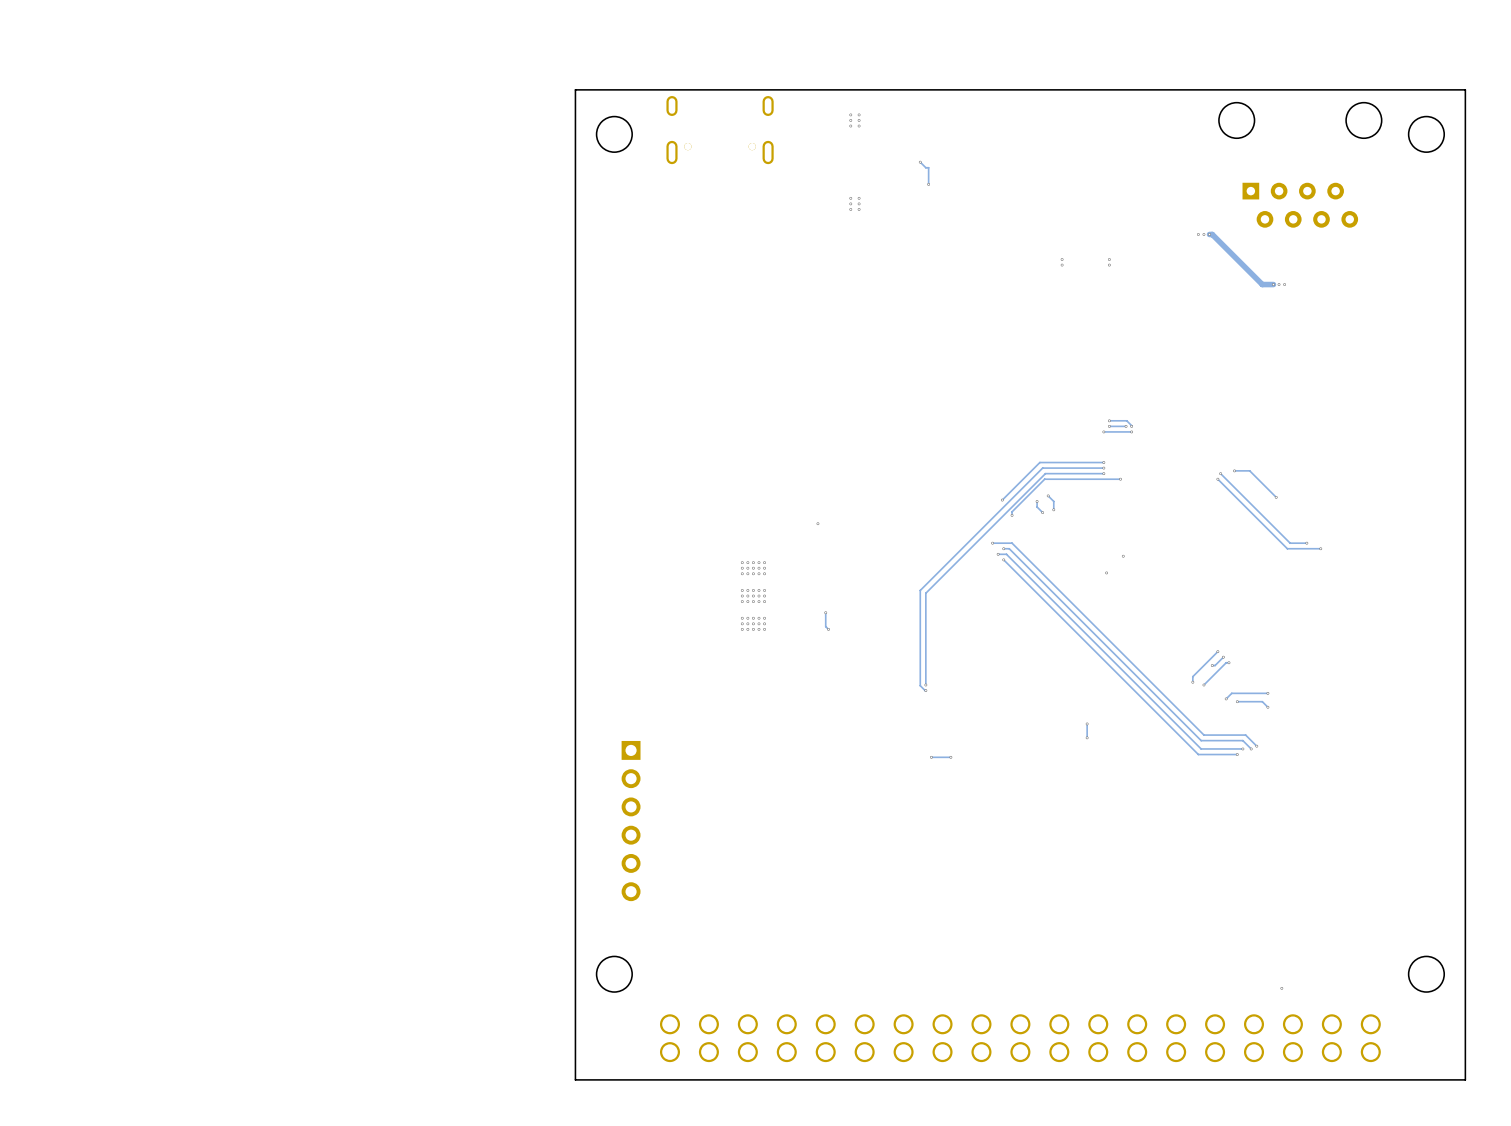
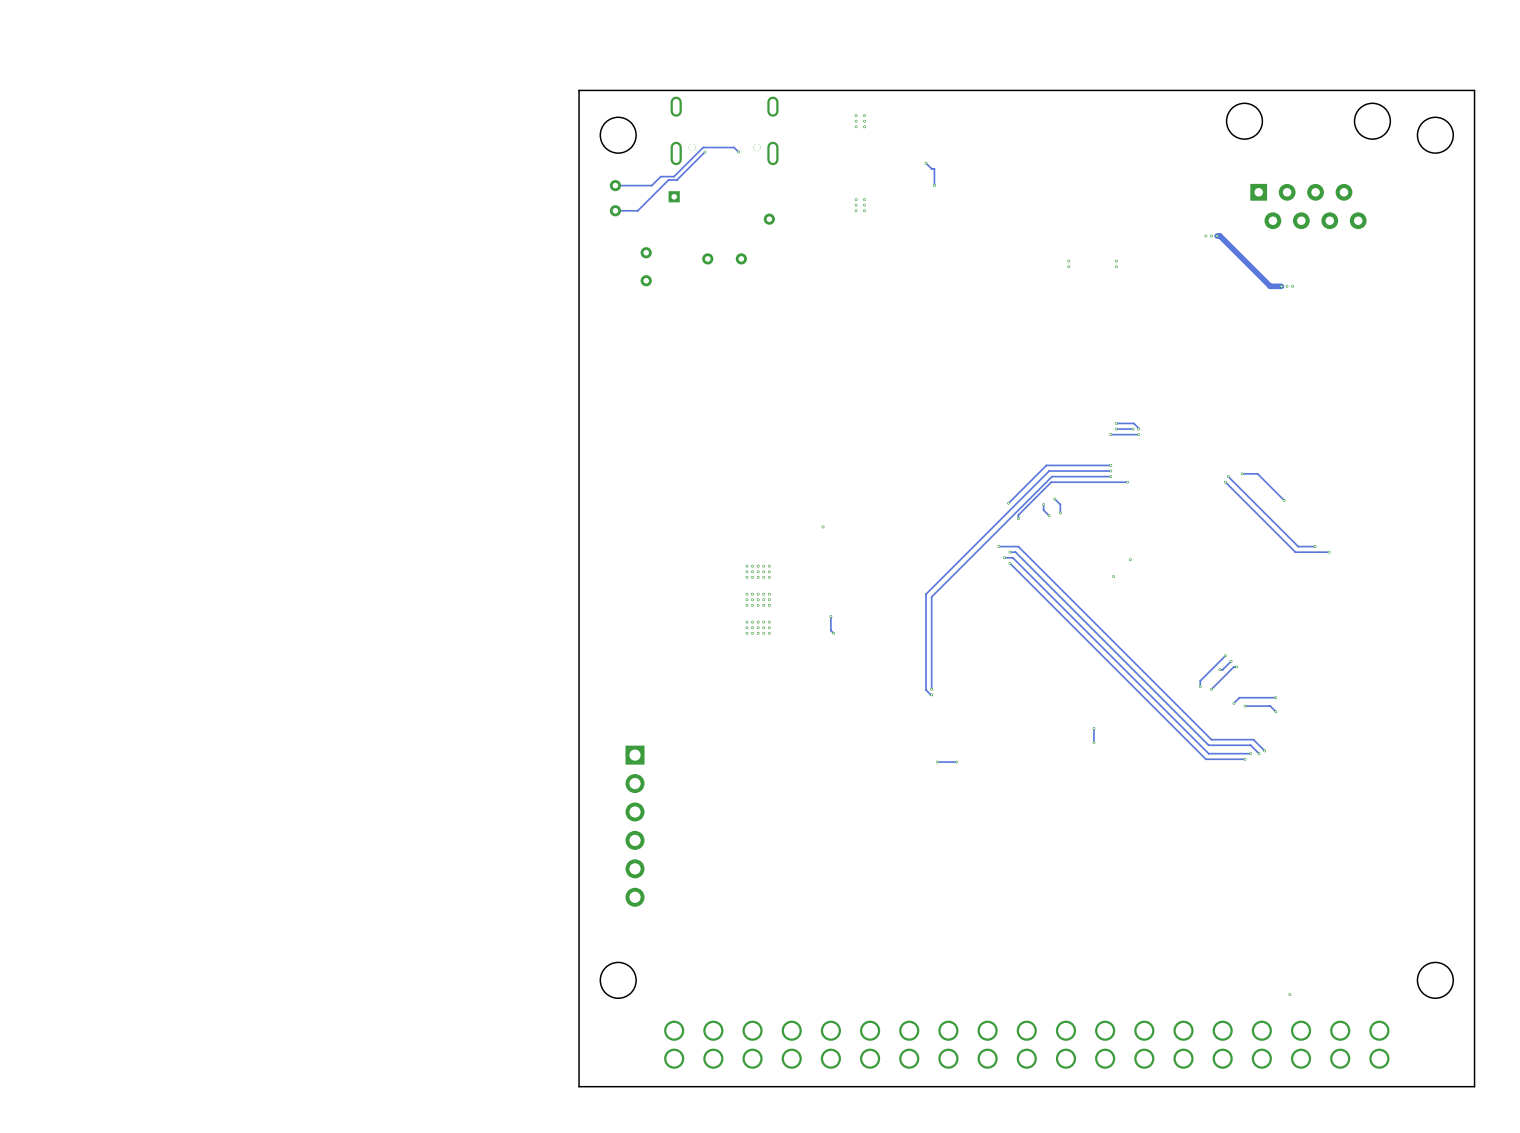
track: none -> (704, 152) (676, 179) (668, 179) (637, 210) (615, 210)
via: none -> (704, 152)
track: none -> (738, 152) (734, 147) (703, 147) (674, 176) (660, 176) (651, 185) (615, 185)
via: none -> (738, 152)
part: none -> (615, 185)
part: none -> (674, 196)
part: none -> (615, 210)
part: none -> (769, 219)
part: none -> (646, 252)
part: none -> (707, 258)
part: none -> (741, 258)
part: none -> (646, 280)

